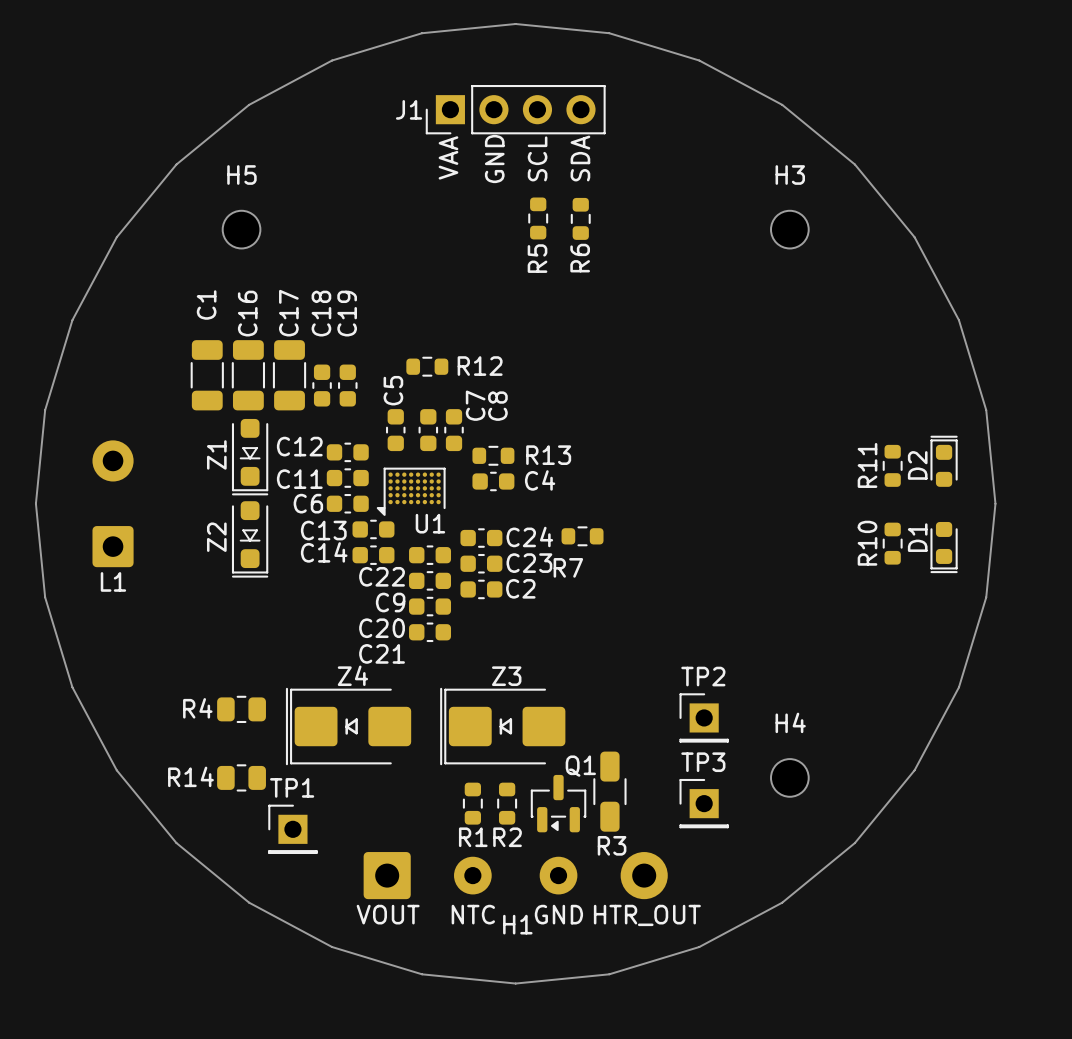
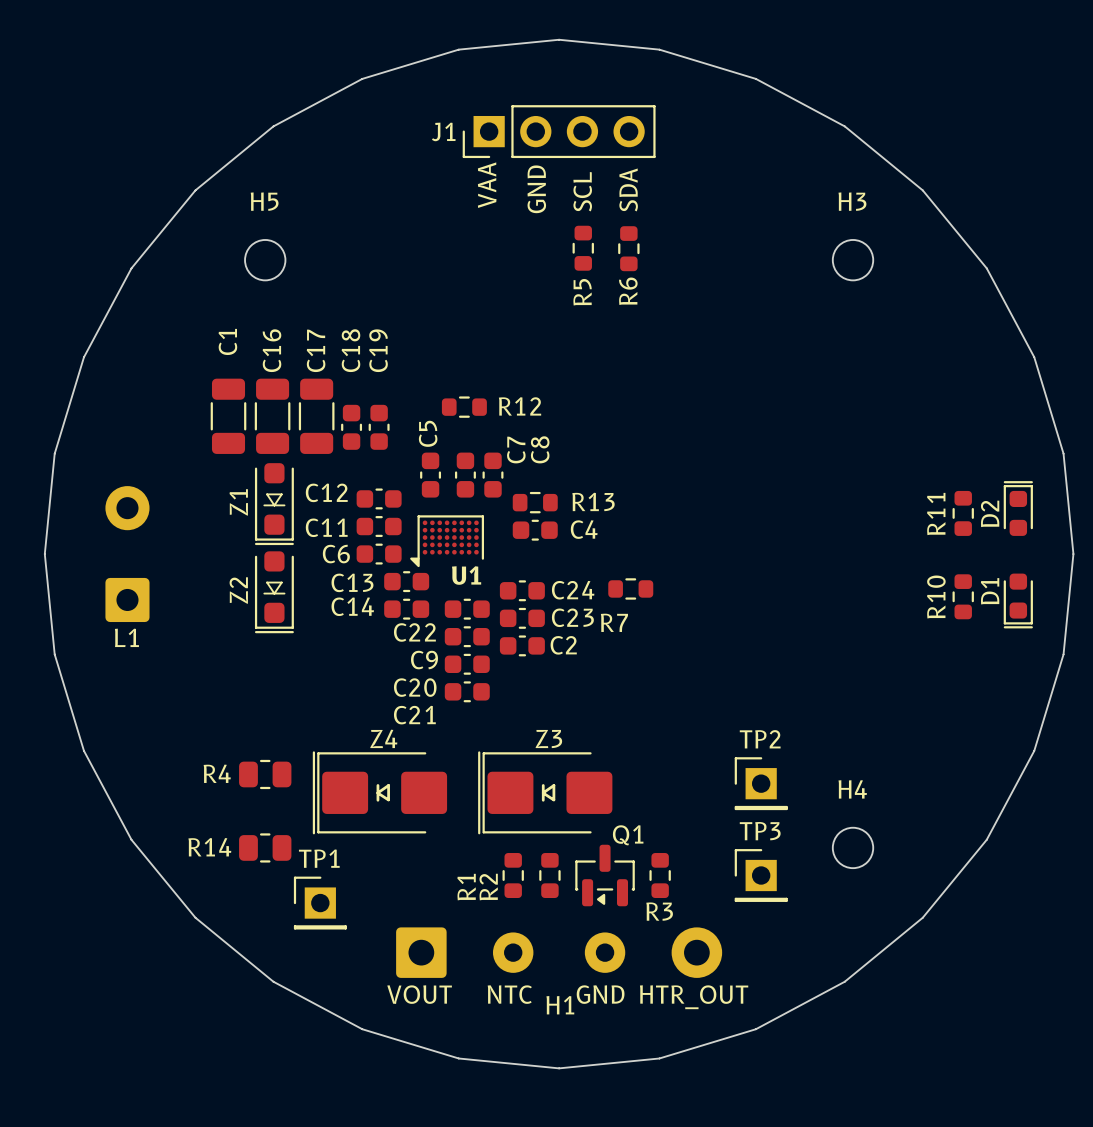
R3 footprint: [593, 751, 627, 832] -> [649, 853, 671, 899]
R1 name rotation: 0° (473, 837) -> 90° counterclockwise (466, 887)
R1 name position: R1 (473, 837) -> R1 (466, 887)
R2 name rotation: 0° (507, 837) -> 90° counterclockwise (488, 887)
R2 name position: R2 (507, 837) -> R2 (488, 887)

